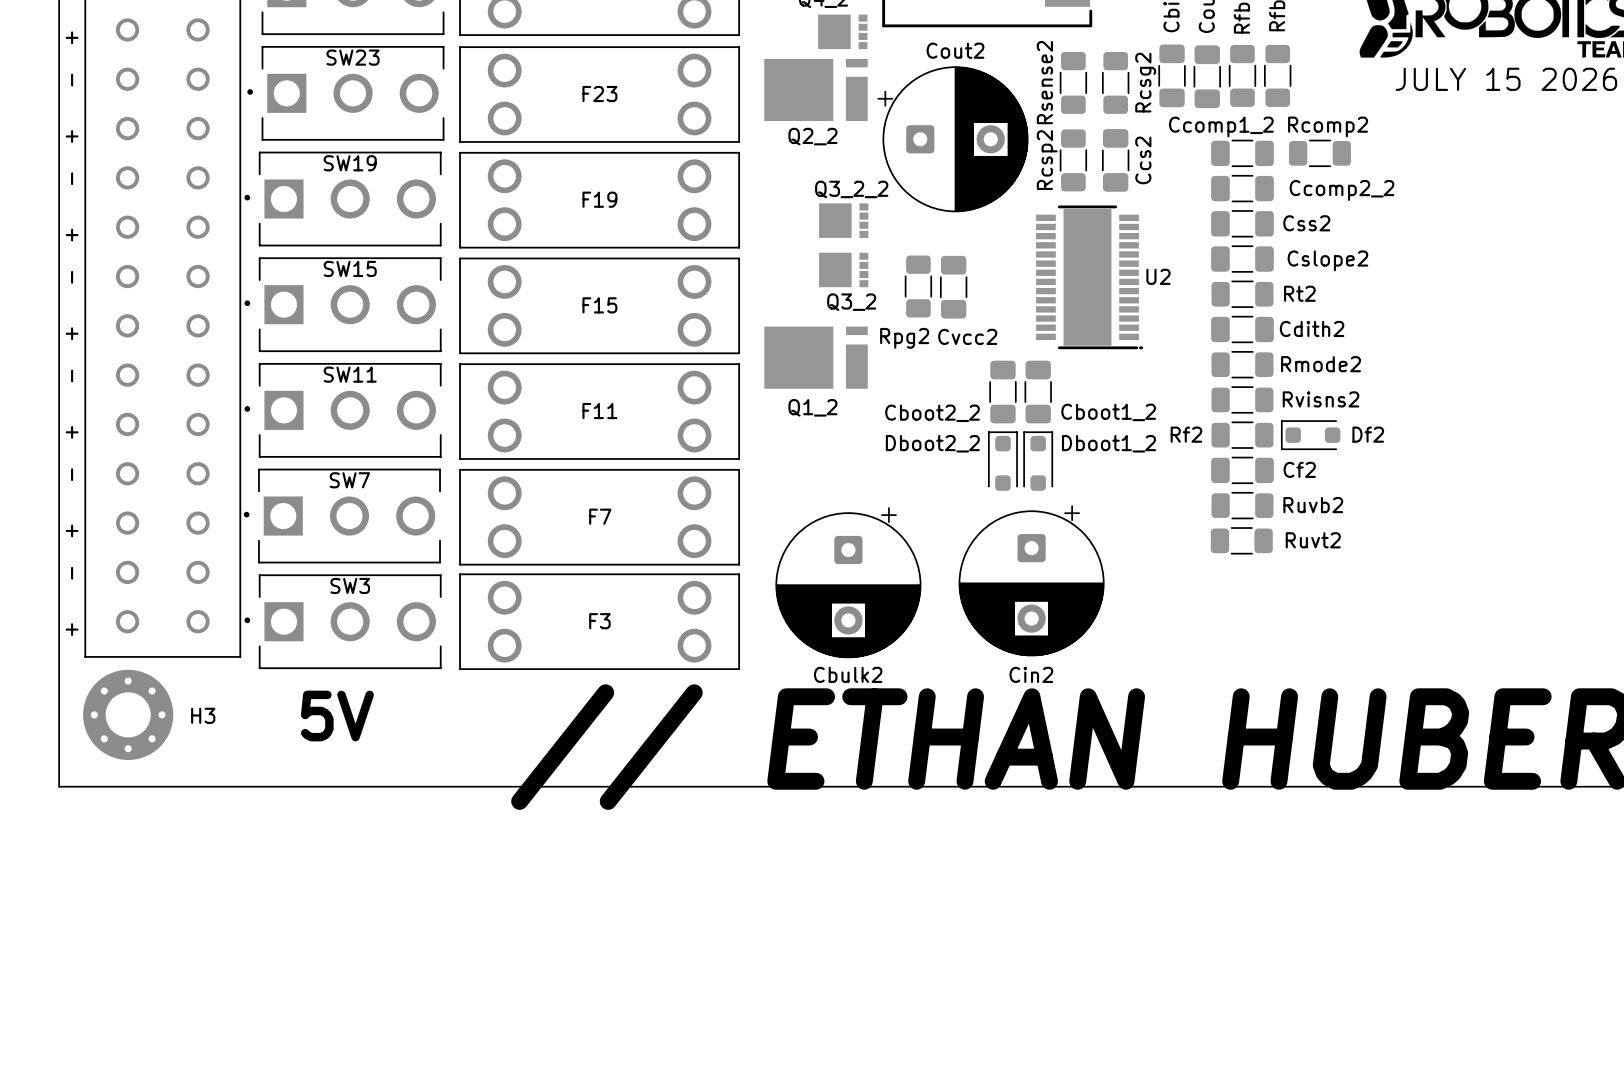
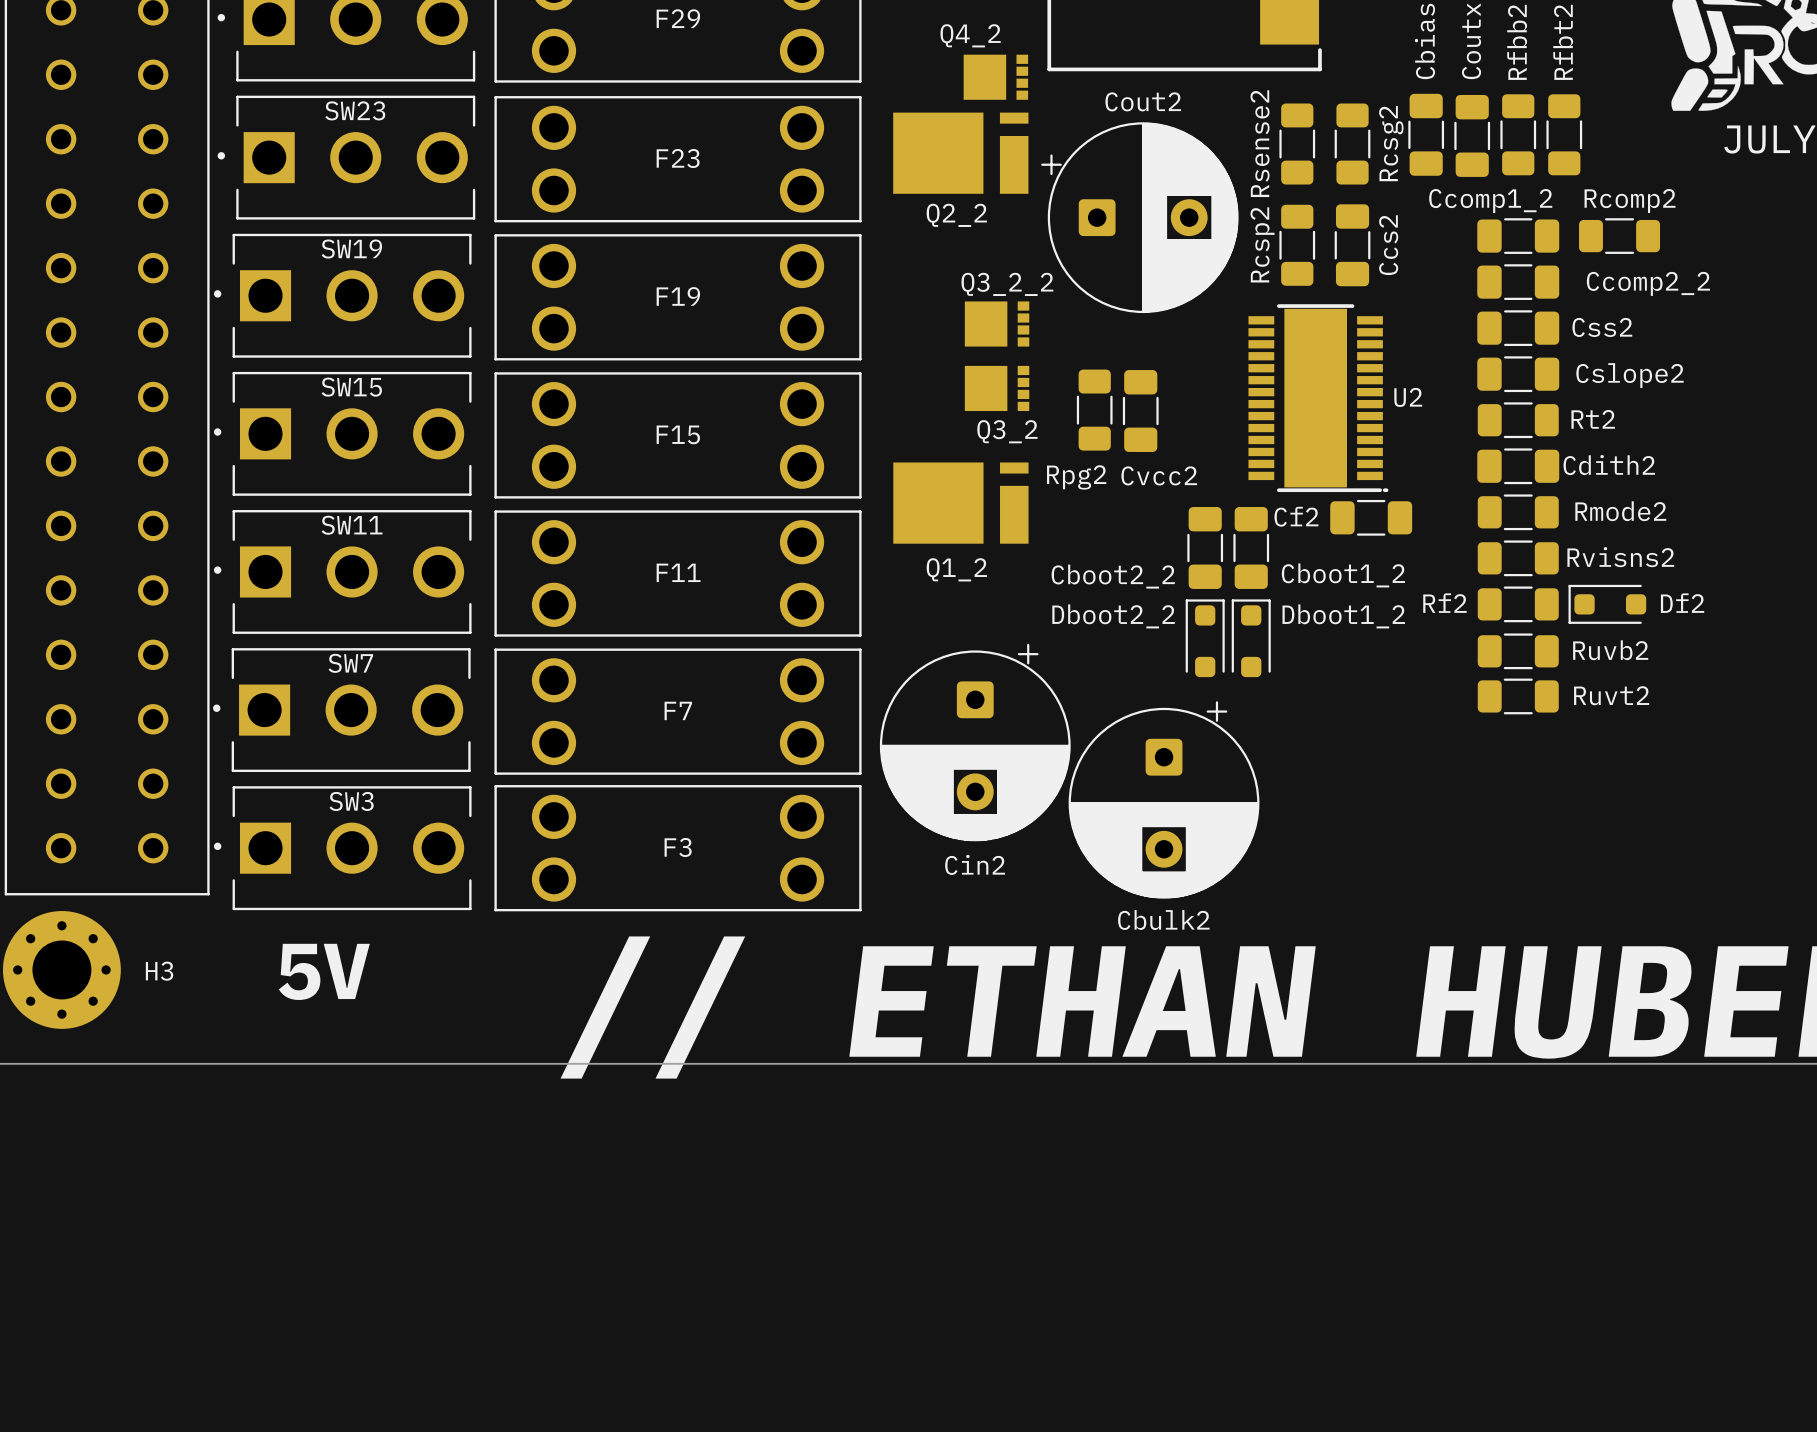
Cf2 name position: Cf2 (1299, 469) -> Cf2 (1296, 516)
Cf2 position: (1242, 470) -> (1371, 517)
Ruvb2: none -> (1518, 651)
Ruvb2 name: Ruvb2 (1313, 505) -> Ruvt2 (1611, 695)
Ruvt2: (1241, 540) -> none
Cin2 position: (1031, 580) -> (975, 742)
Cbulk2 position: (848, 582) -> (1164, 799)

